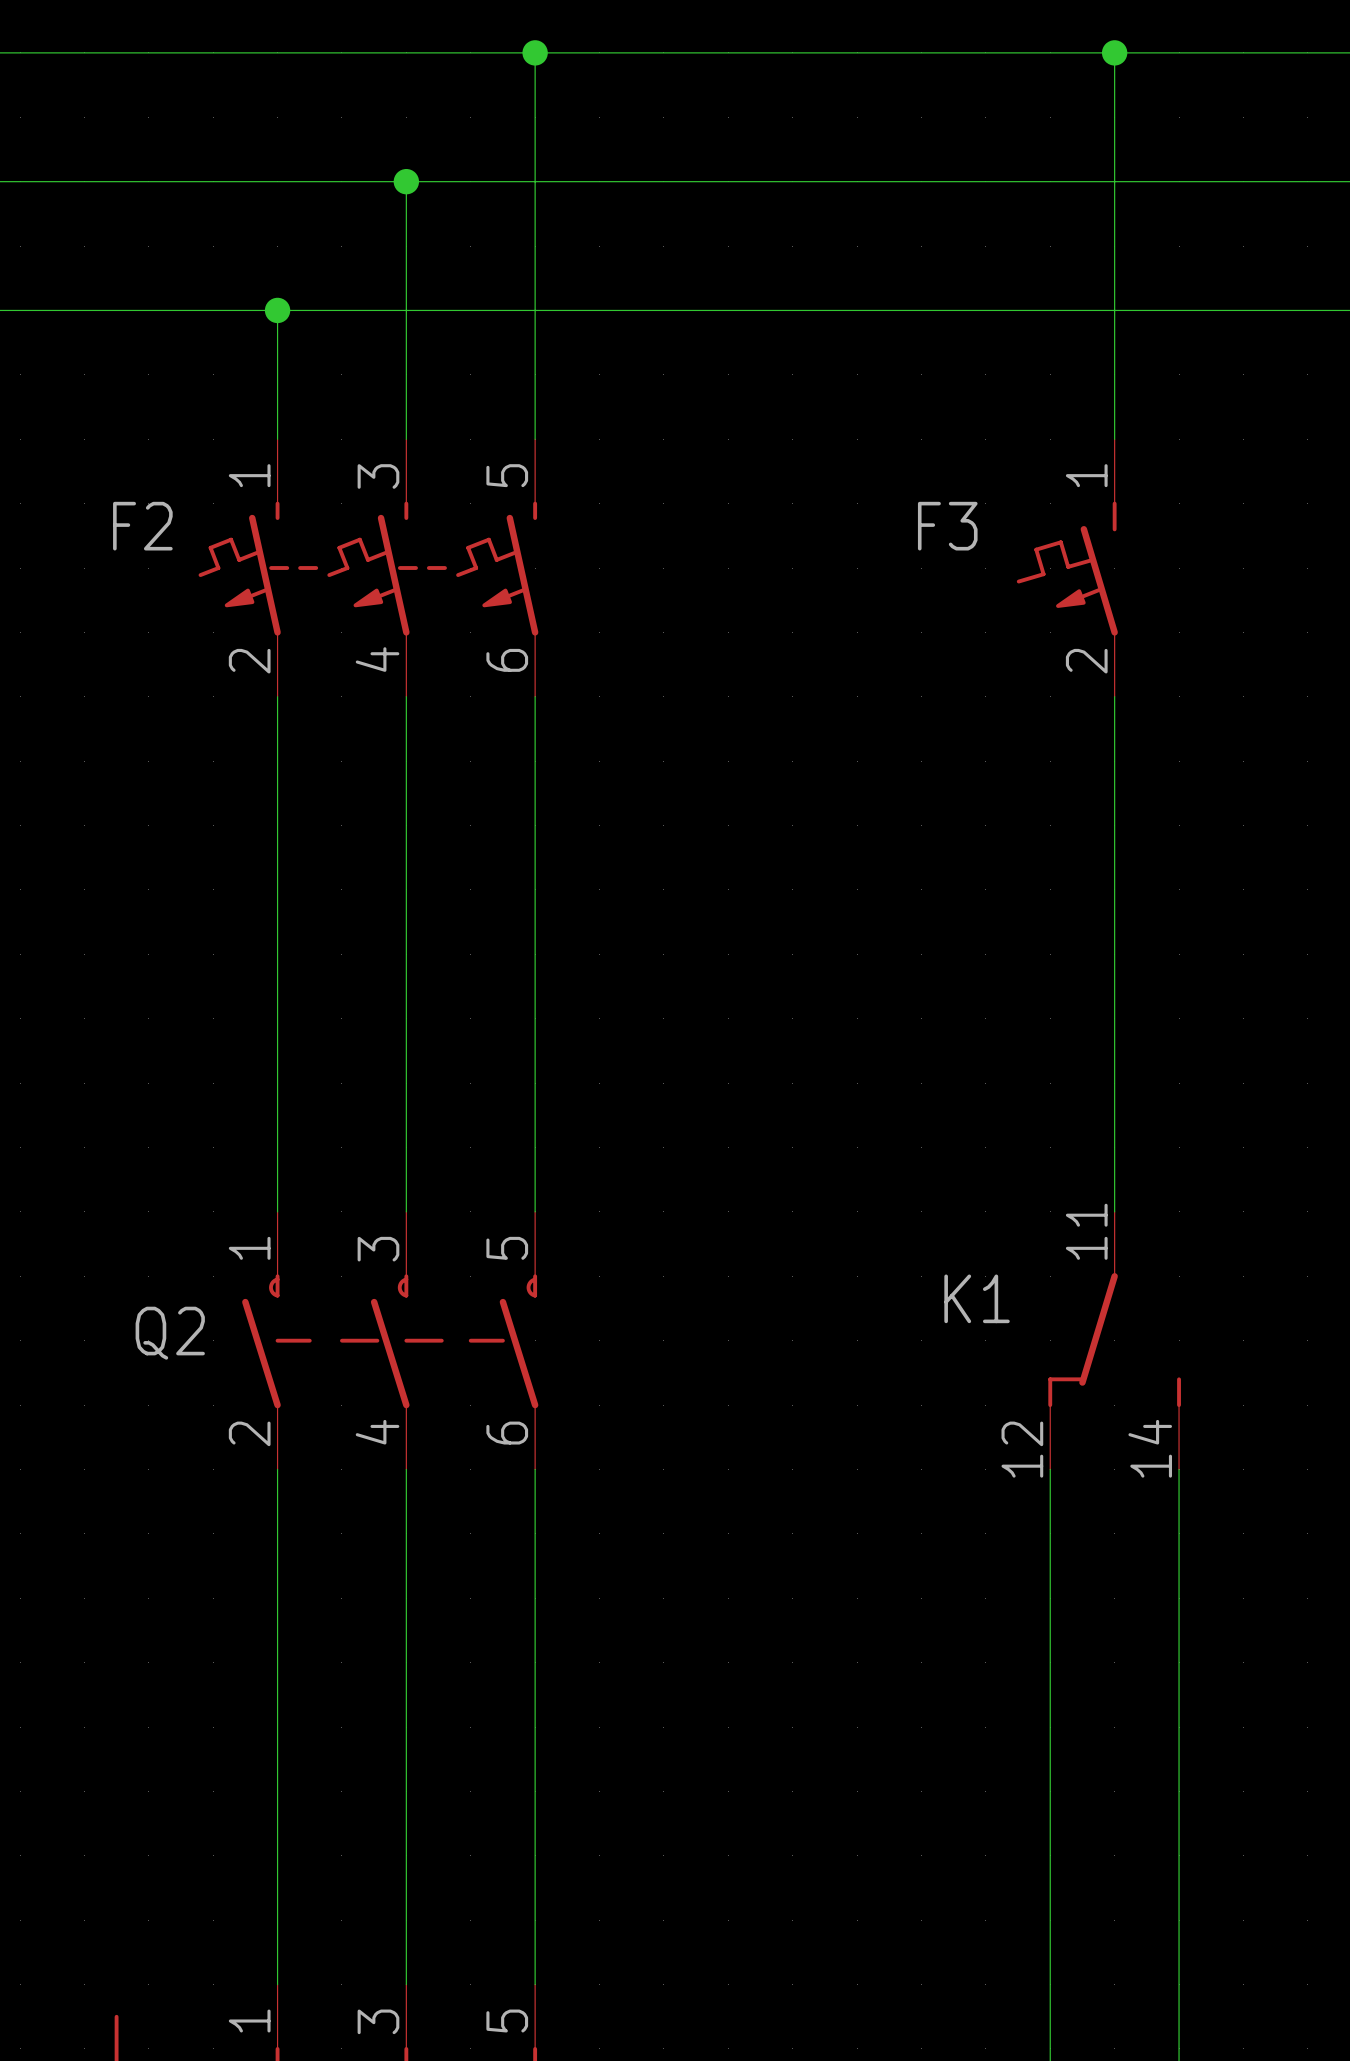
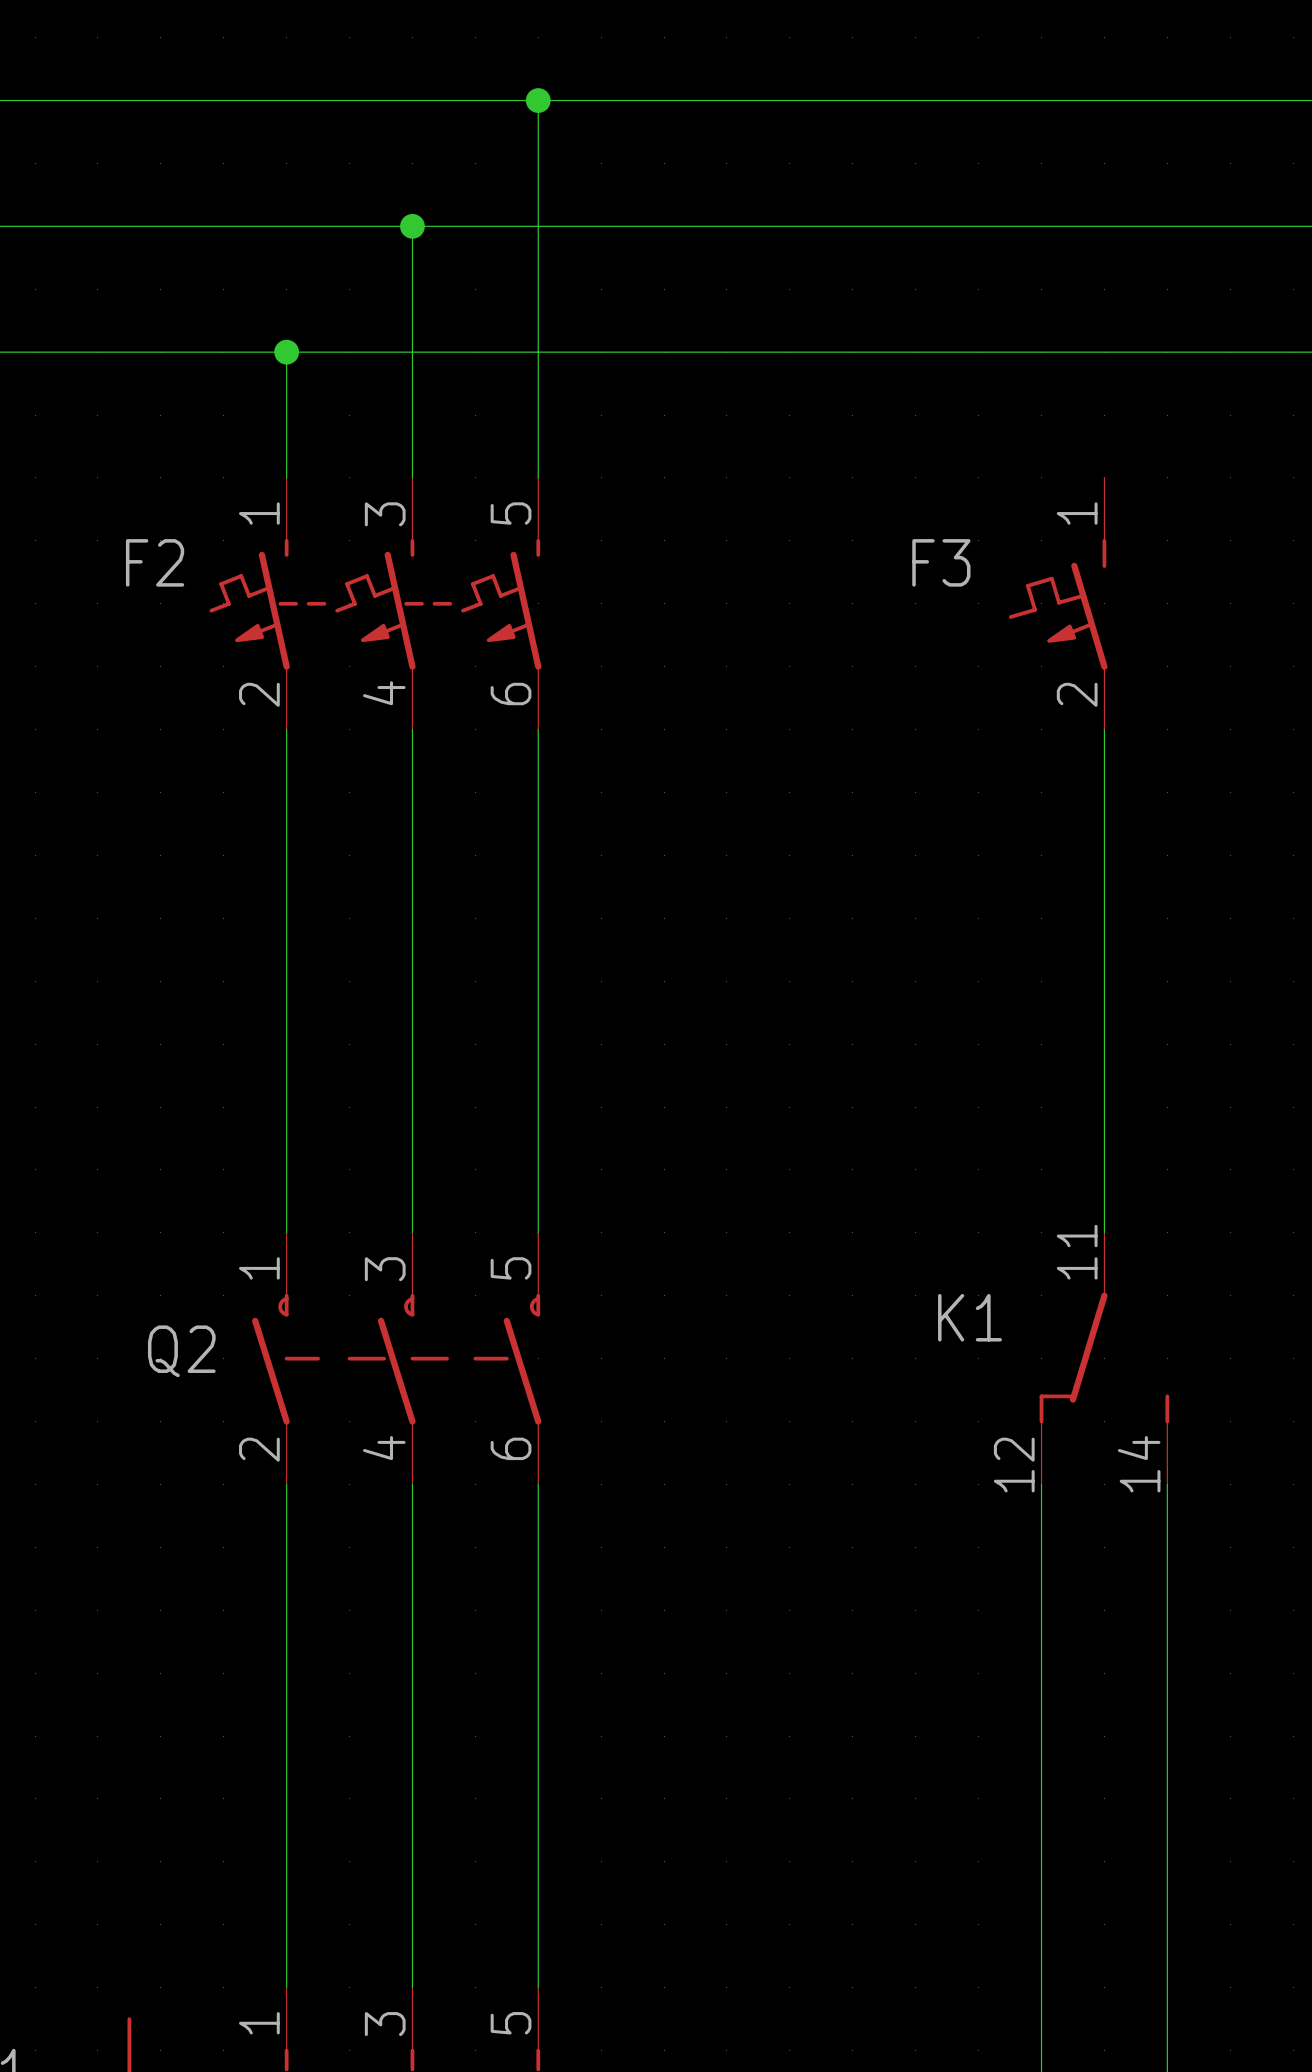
wire: (1114, 52) (1114, 439) -> none
junction: (1114, 52) -> none

